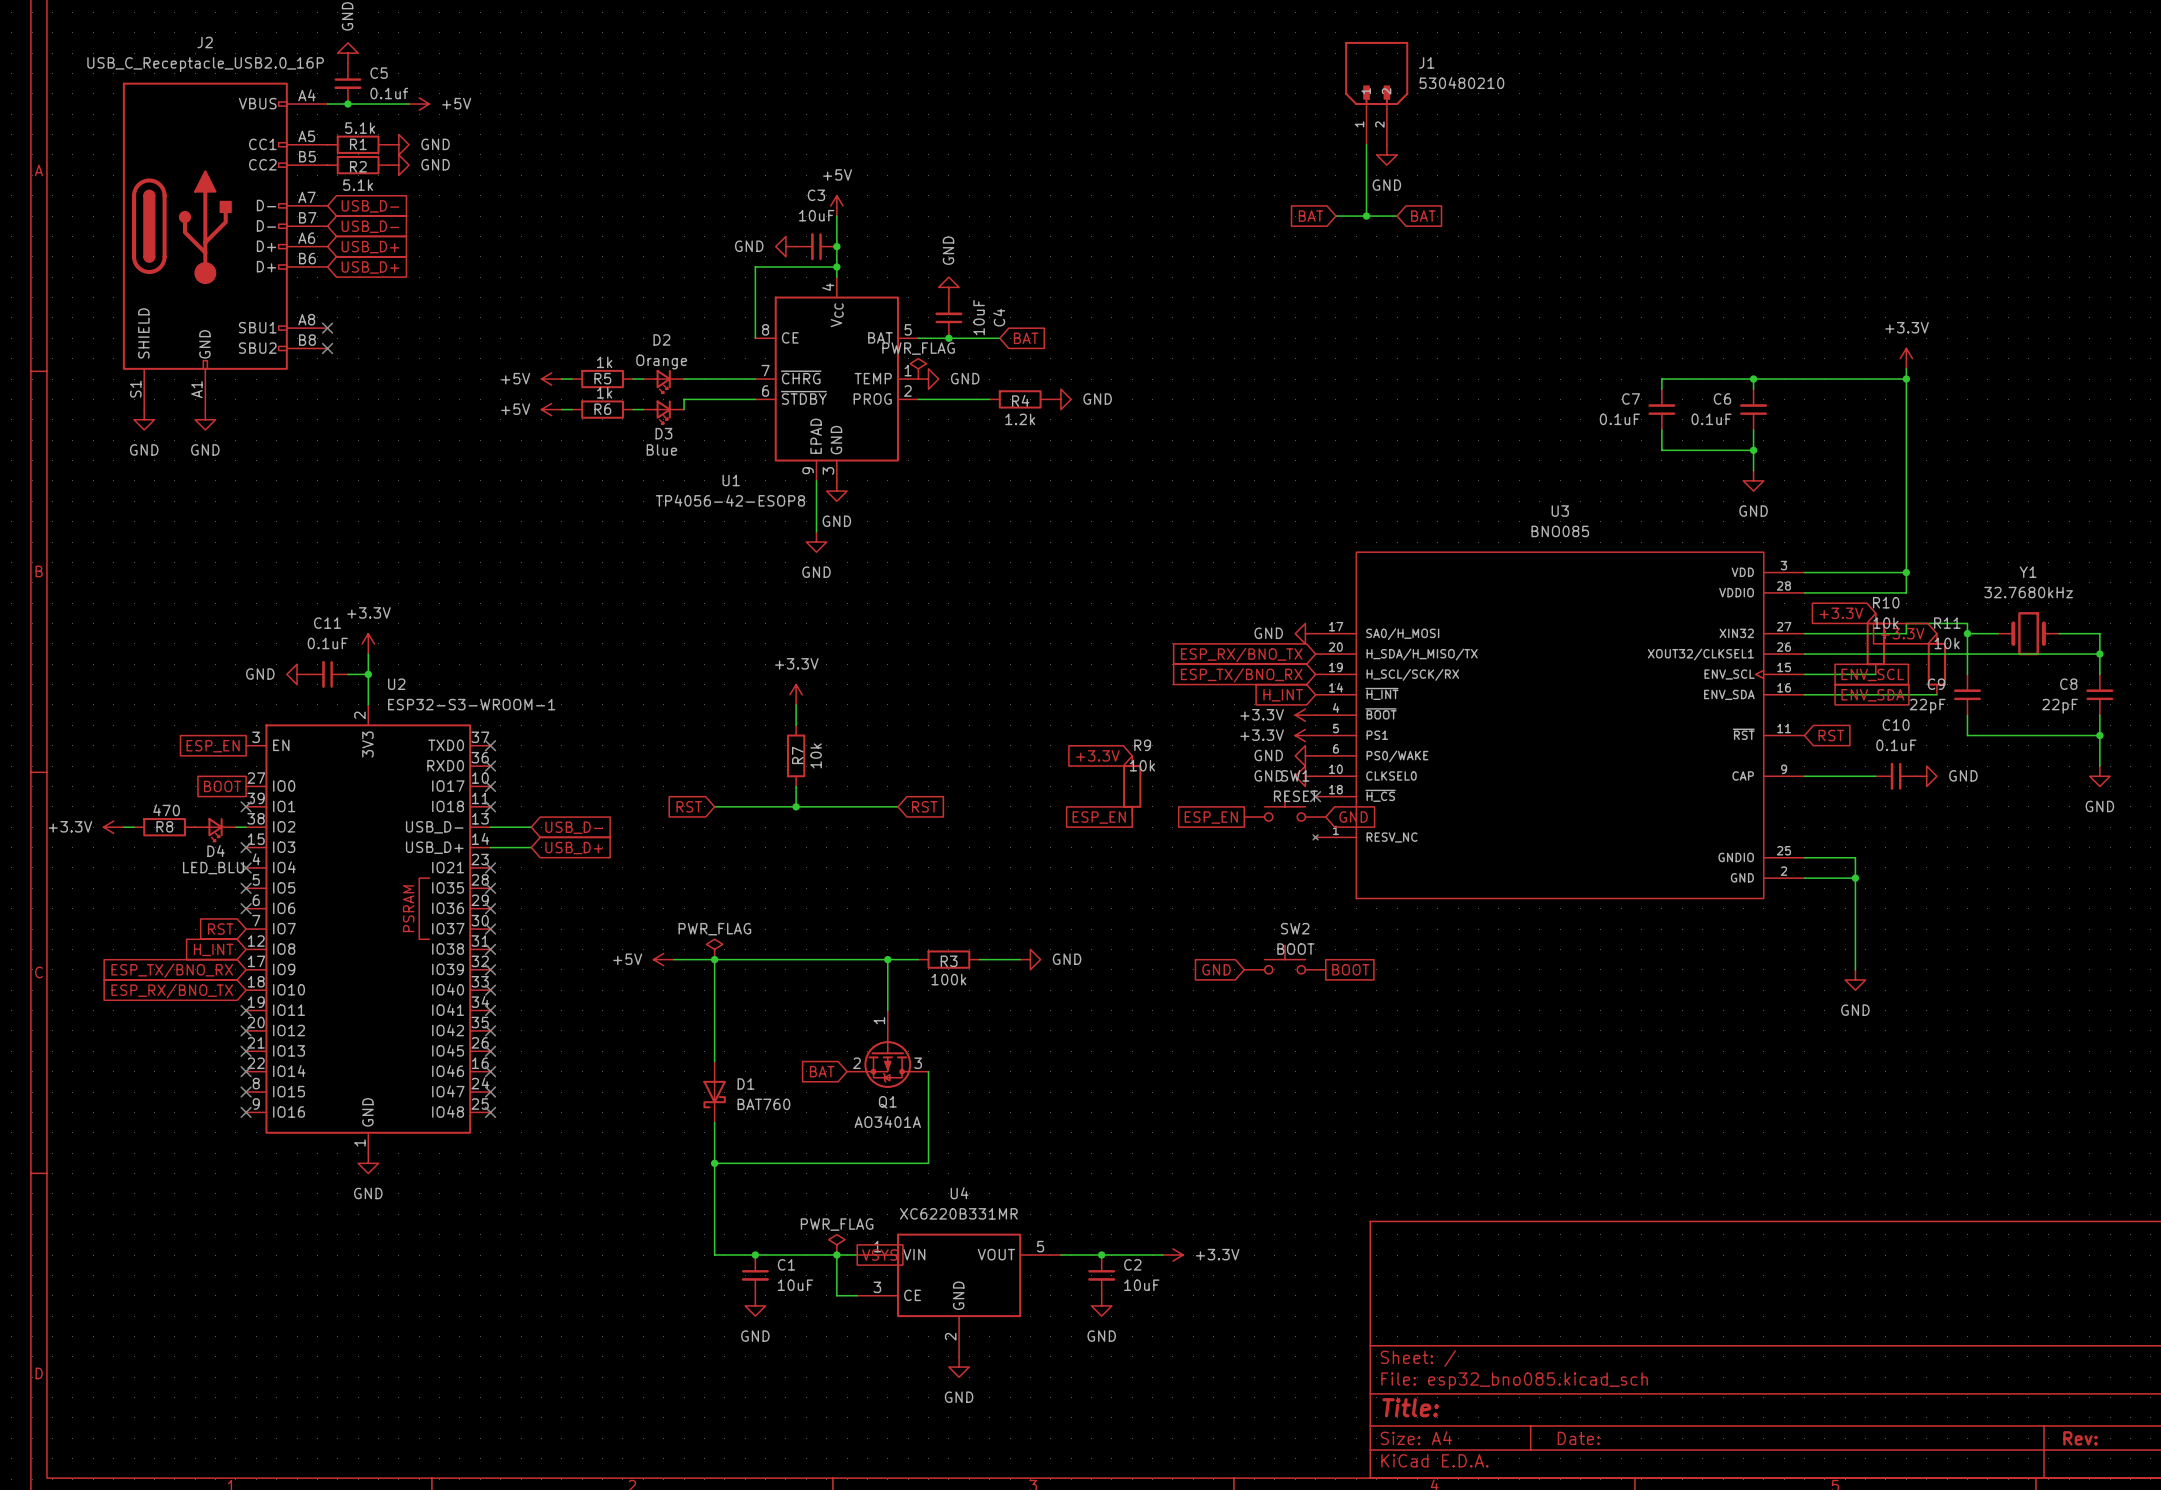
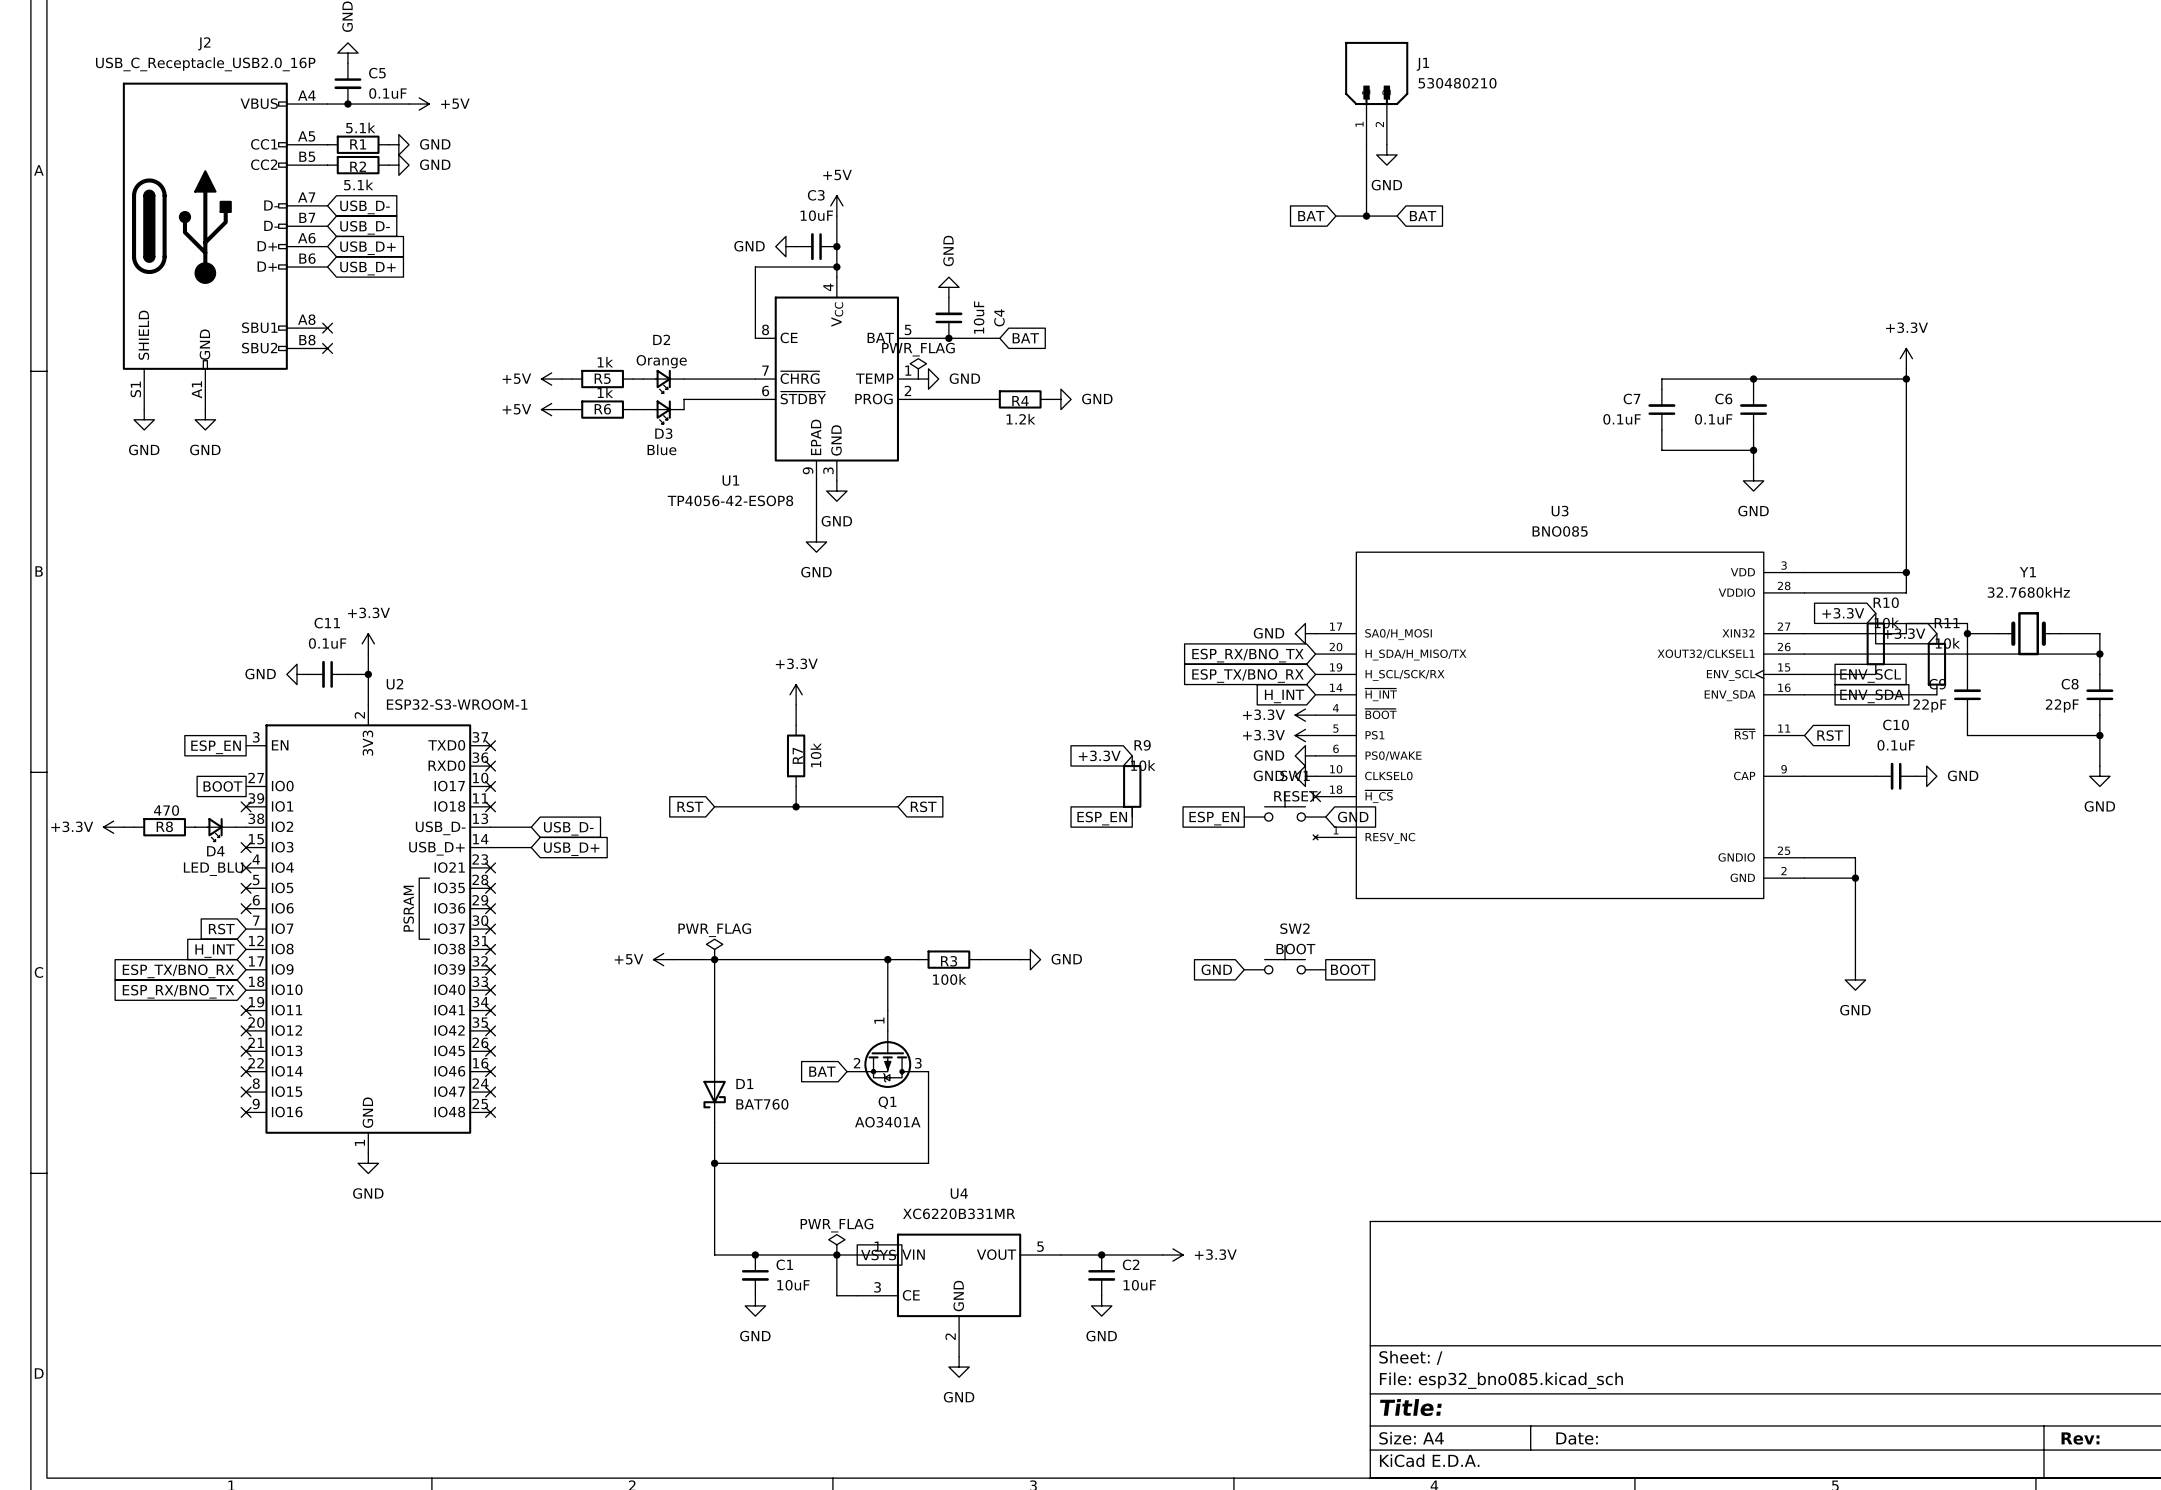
C5 value: 0.1uf (389, 93) -> 0.1uF (387, 93)

